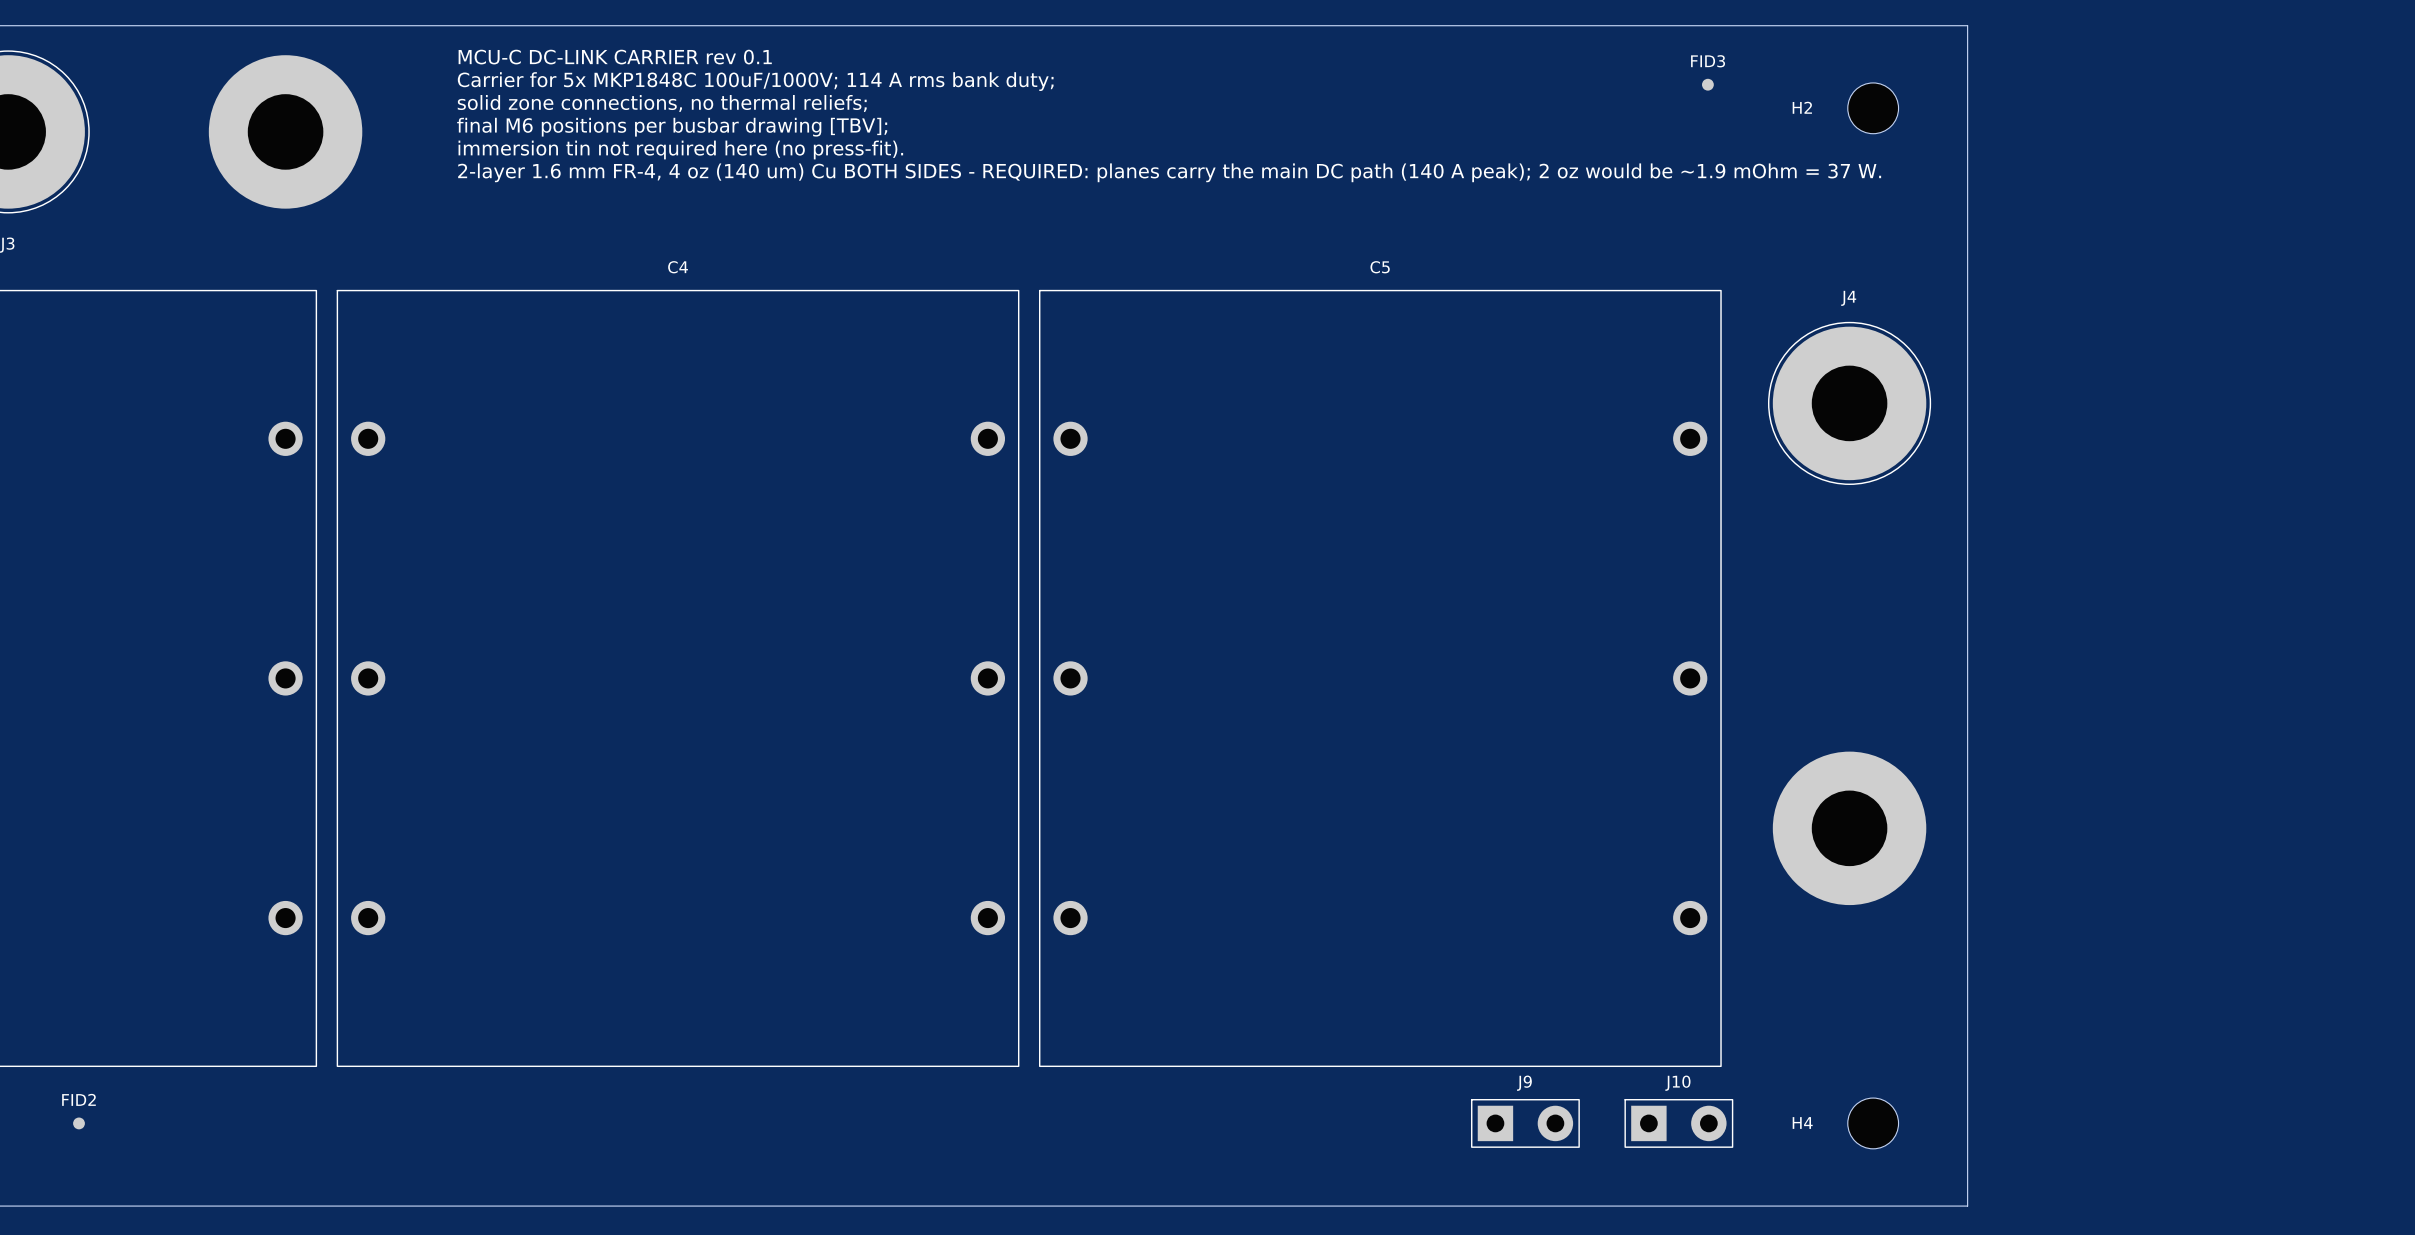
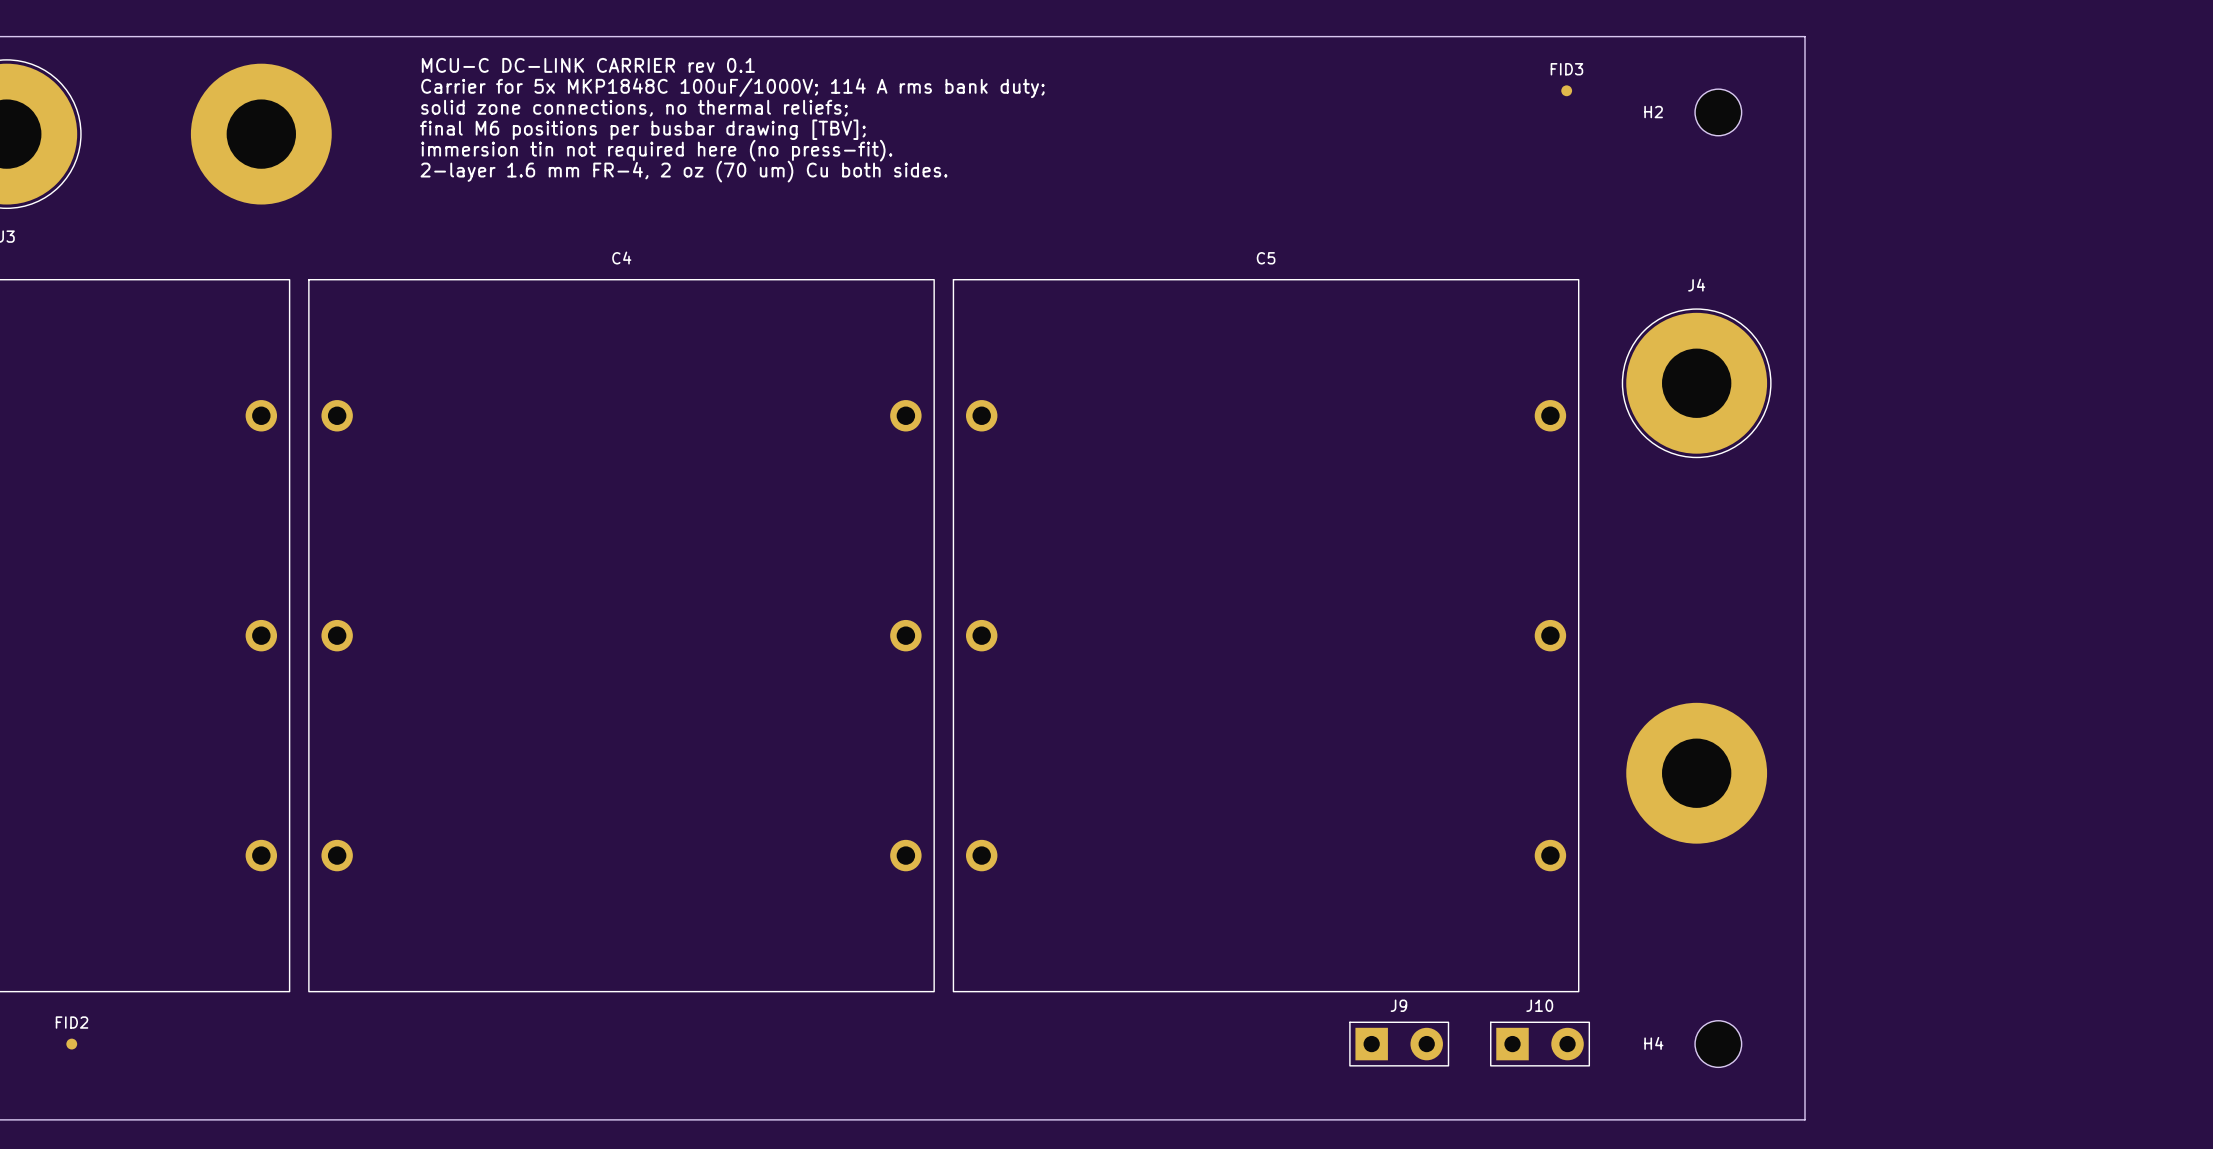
text: 2-layer 1.6 mm FR-4, 4 oz (140 um) Cu BOTH SIDES - REQUIRED: planes carry the main DC path (140 A peak); 2 oz would be ~1.9 mOhm = 37 W. (1169, 172) -> 2-layer 1.6 mm FR-4, 2 oz (70 um) Cu both sides. (684, 171)

